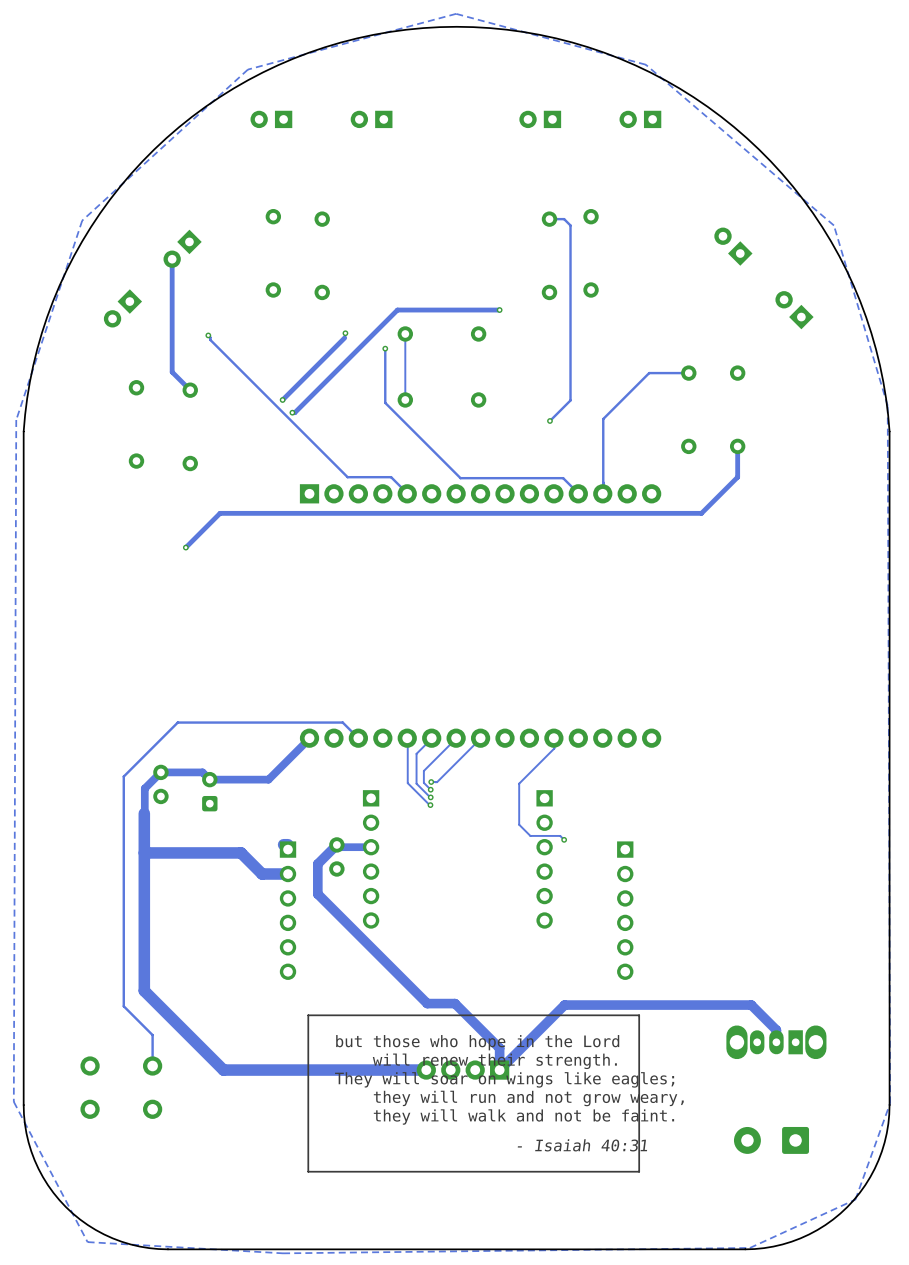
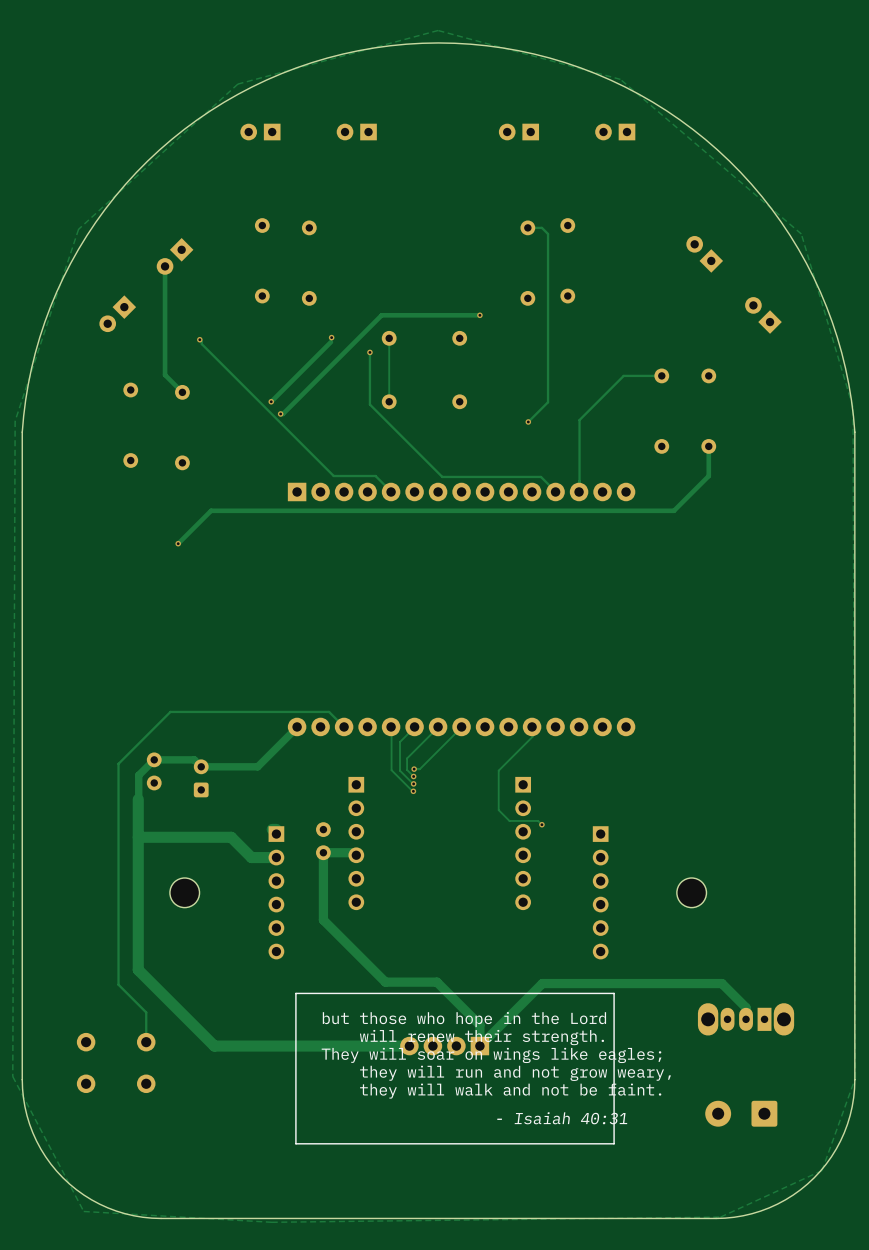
track: (336, 844) (317, 863) (317, 894) (427, 1003) -> (356, 855) (353, 852) (323, 852) (323, 920) (385, 982) (410, 982)
track: (371, 847) (339, 847) -> none
part: none -> (184, 892)
part: none -> (691, 892)

